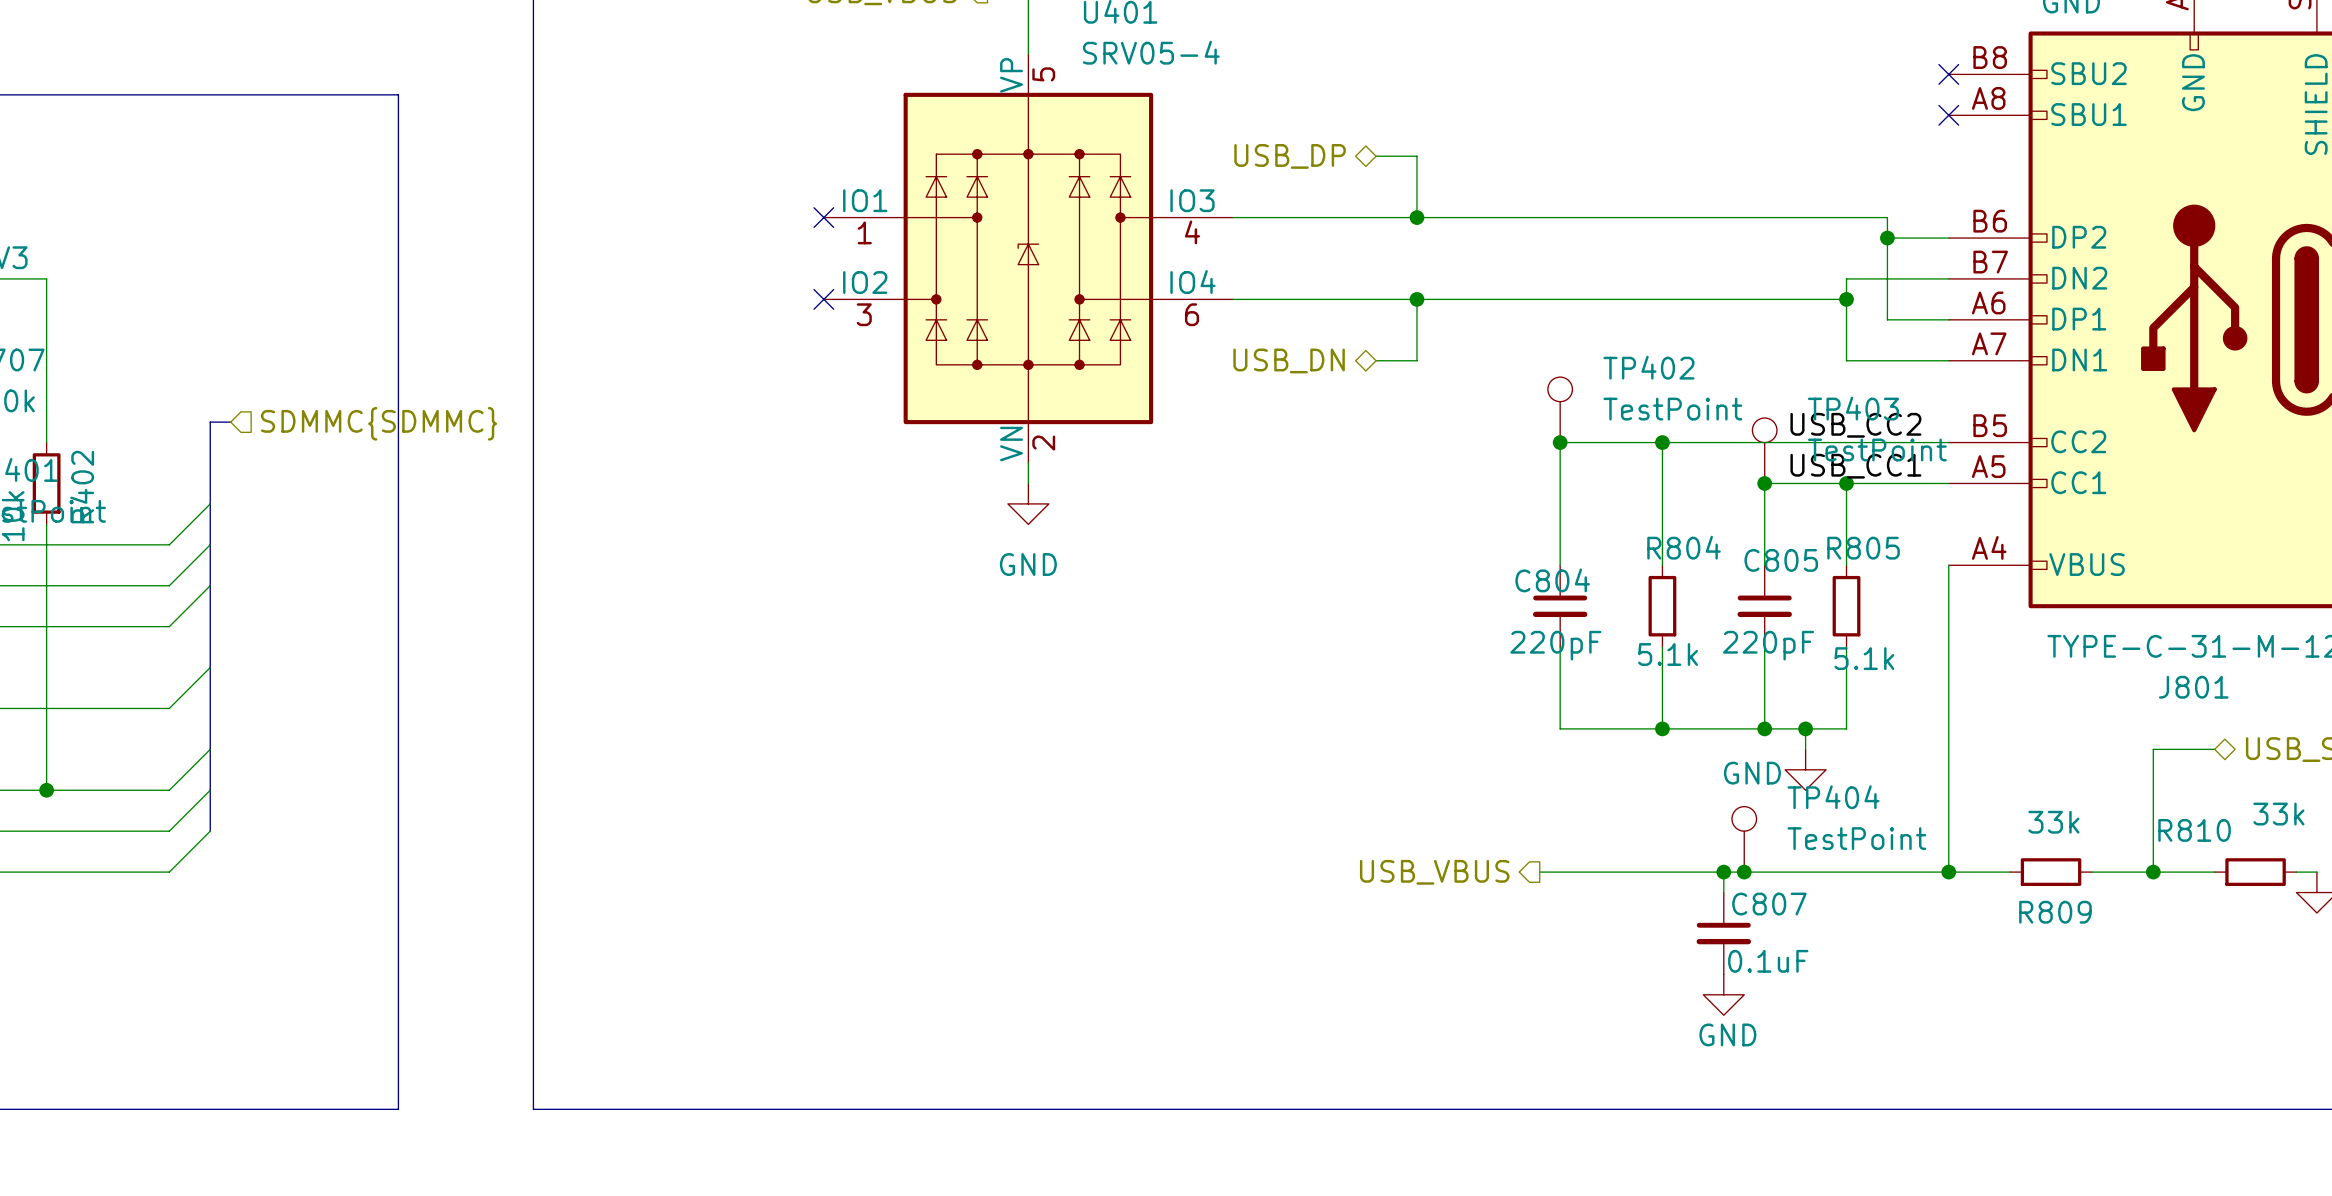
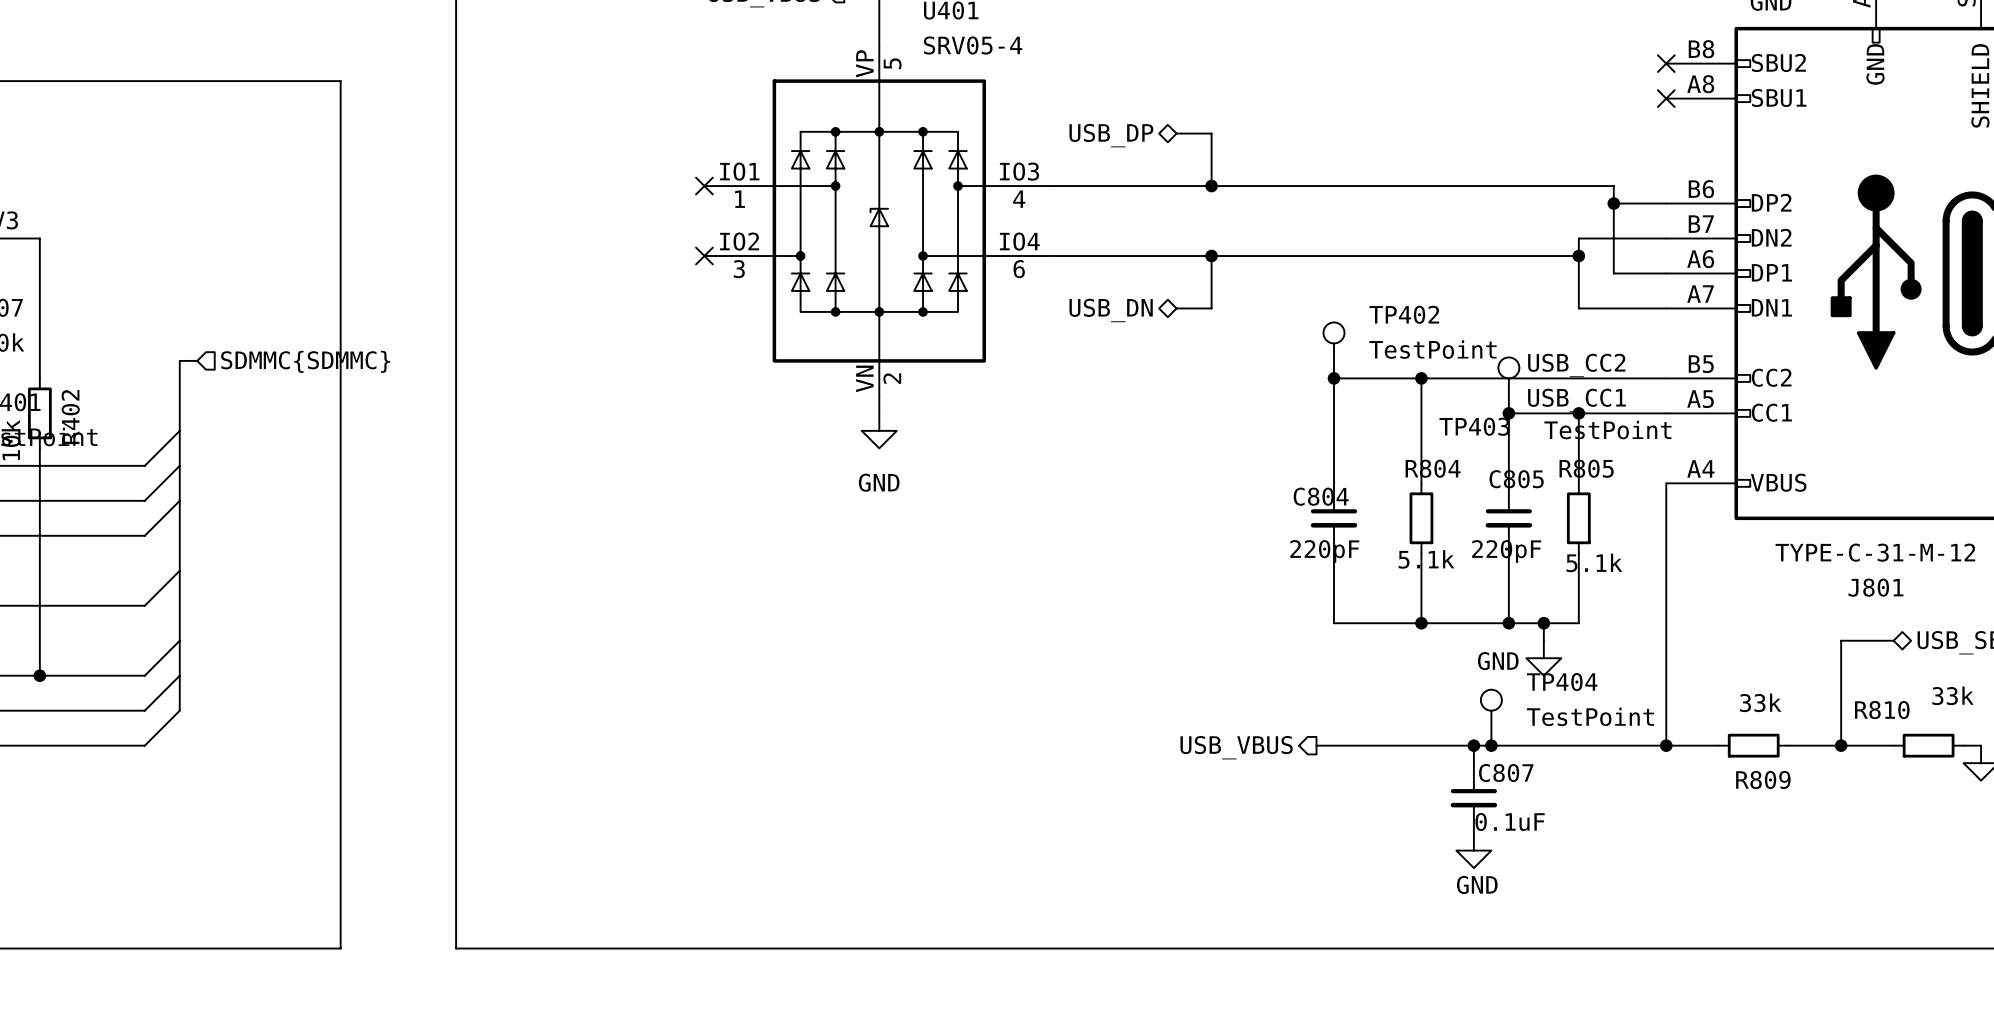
TP403 name position: TP403 (1853, 408) -> TP403 (1474, 426)
TP403 value position: TestPoint (1877, 449) -> TestPoint (1607, 430)

